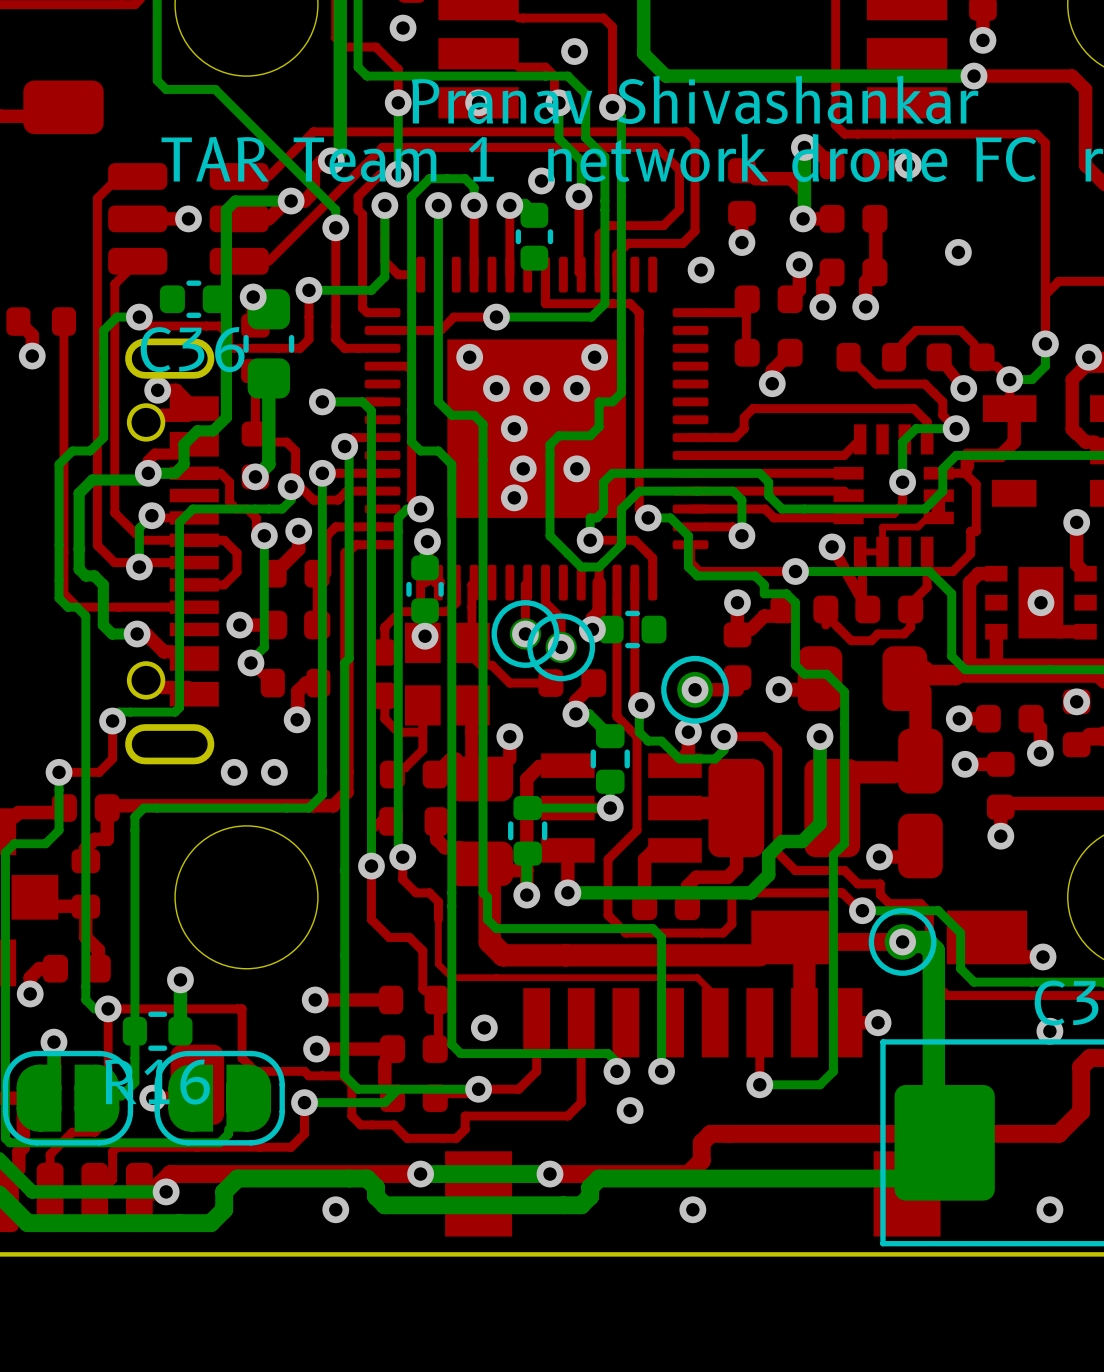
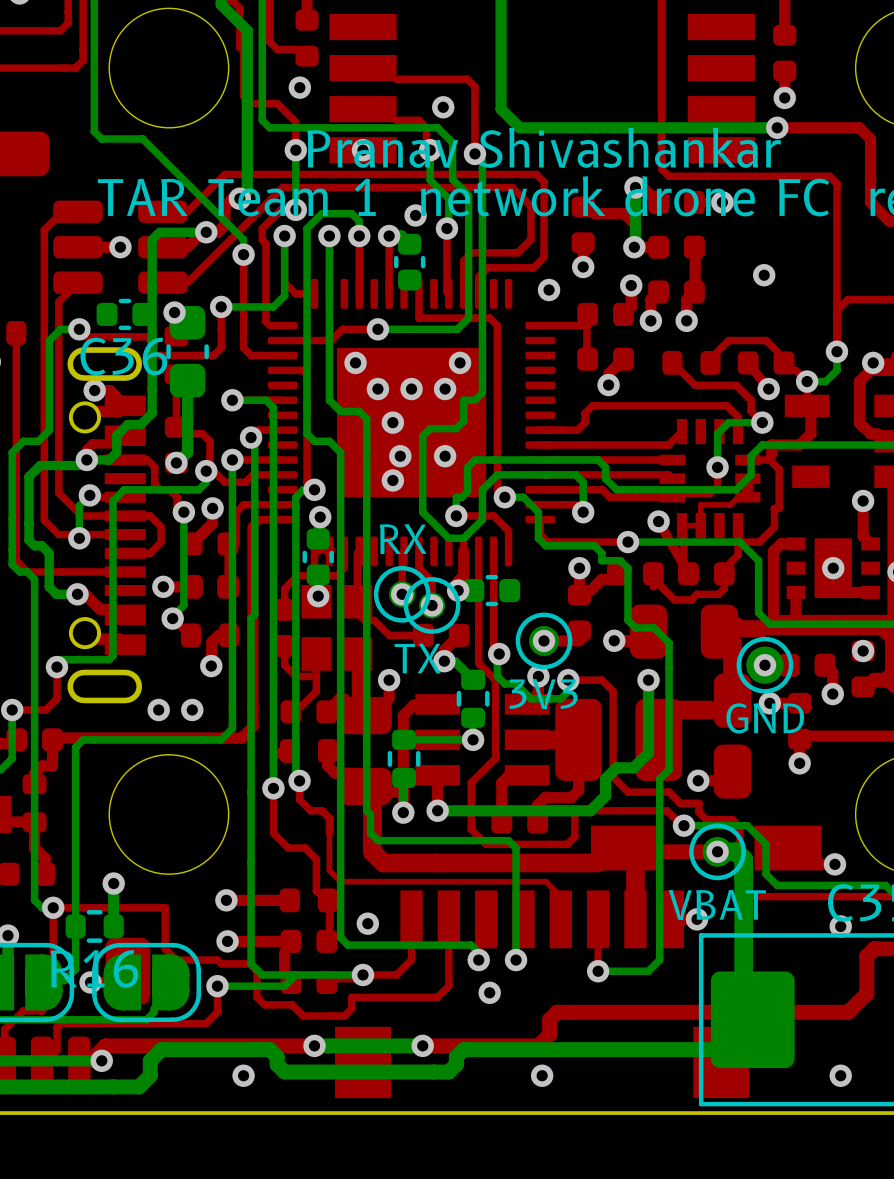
text: none -> RX (403, 539)
text: none -> TX (417, 658)
part: none -> (764, 665)
text: none -> 3V3 (543, 694)
text: none -> GND (765, 718)
text: none -> VBAT (717, 905)

